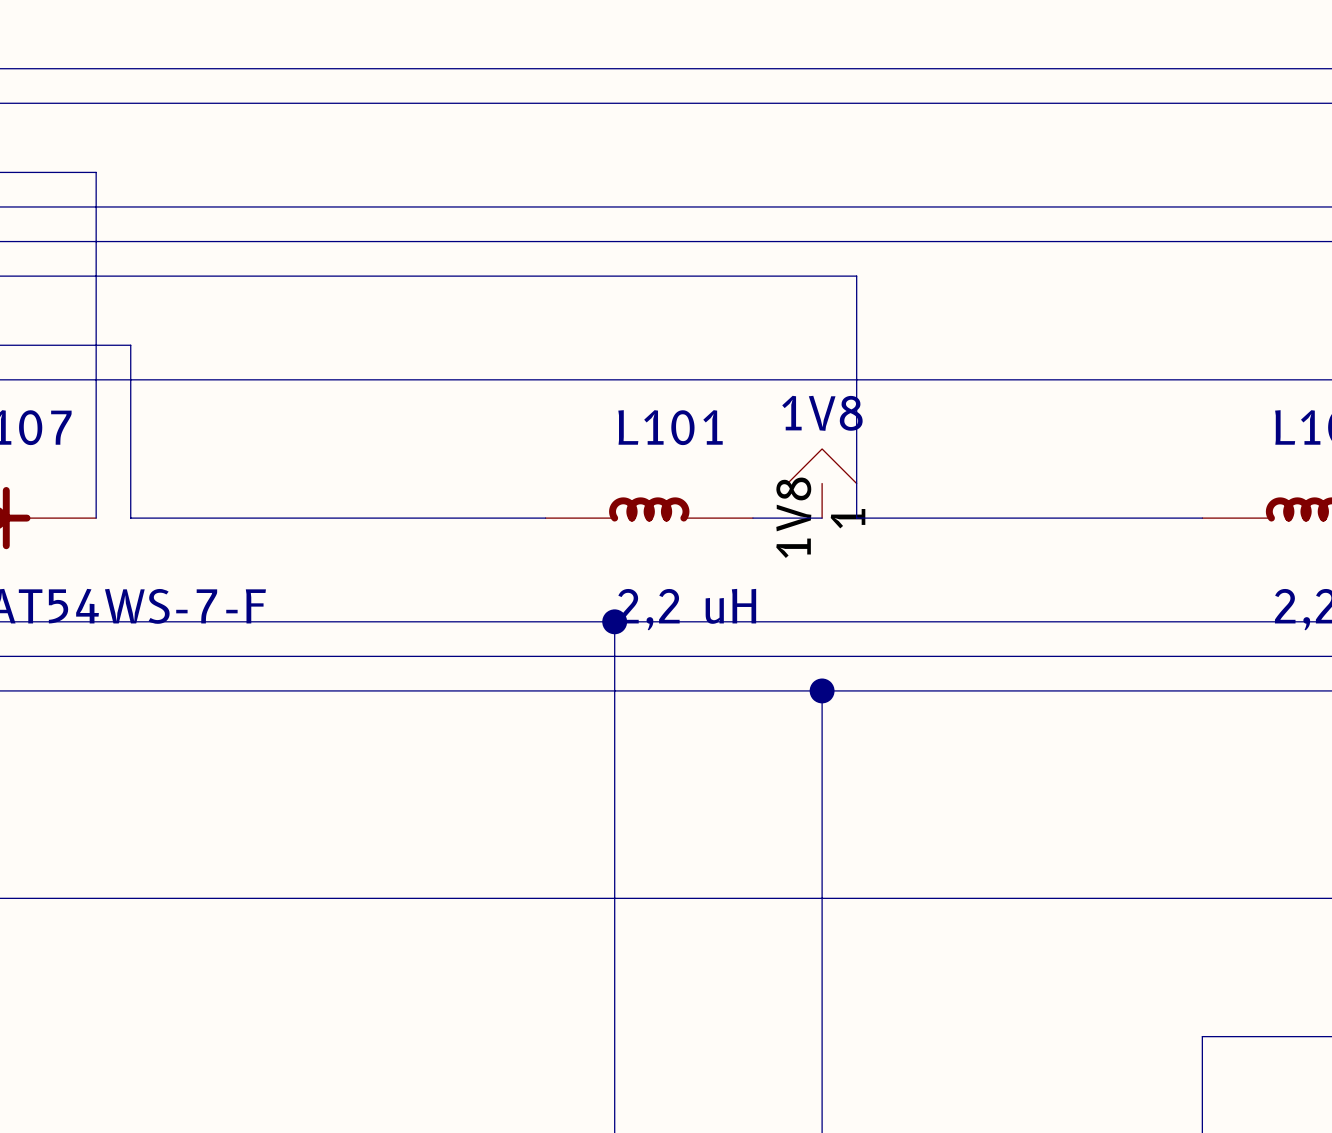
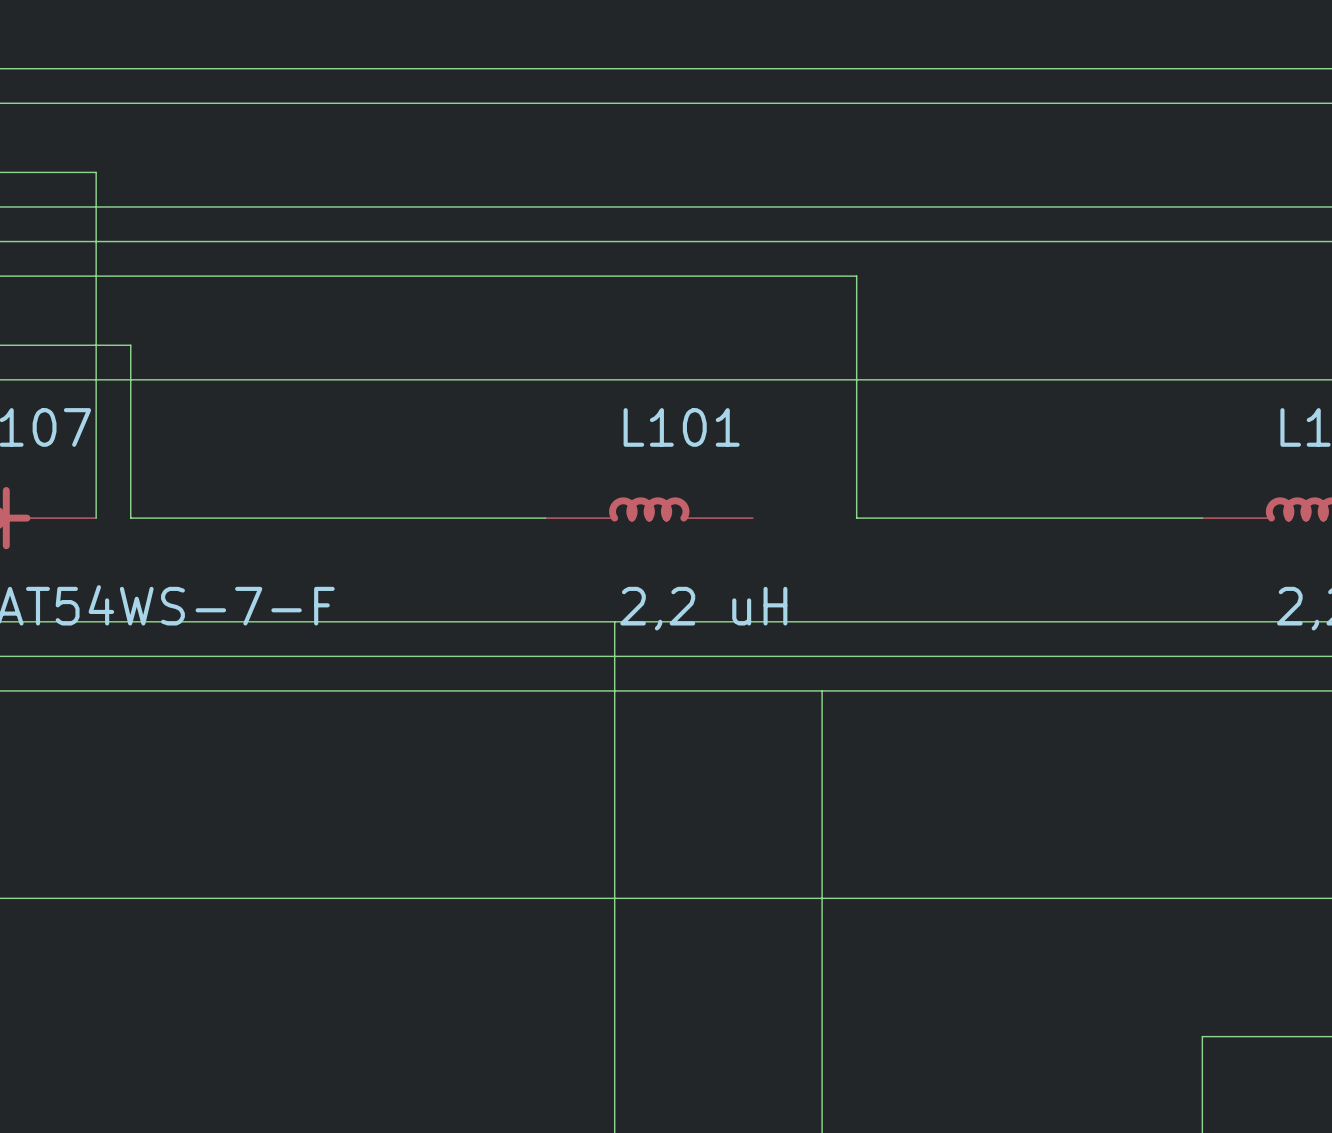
power symbol: 1V8 (822, 483) -> none
wire: (752, 518) (822, 518) -> none
junction: (614, 621) -> none
junction: (822, 690) -> none

